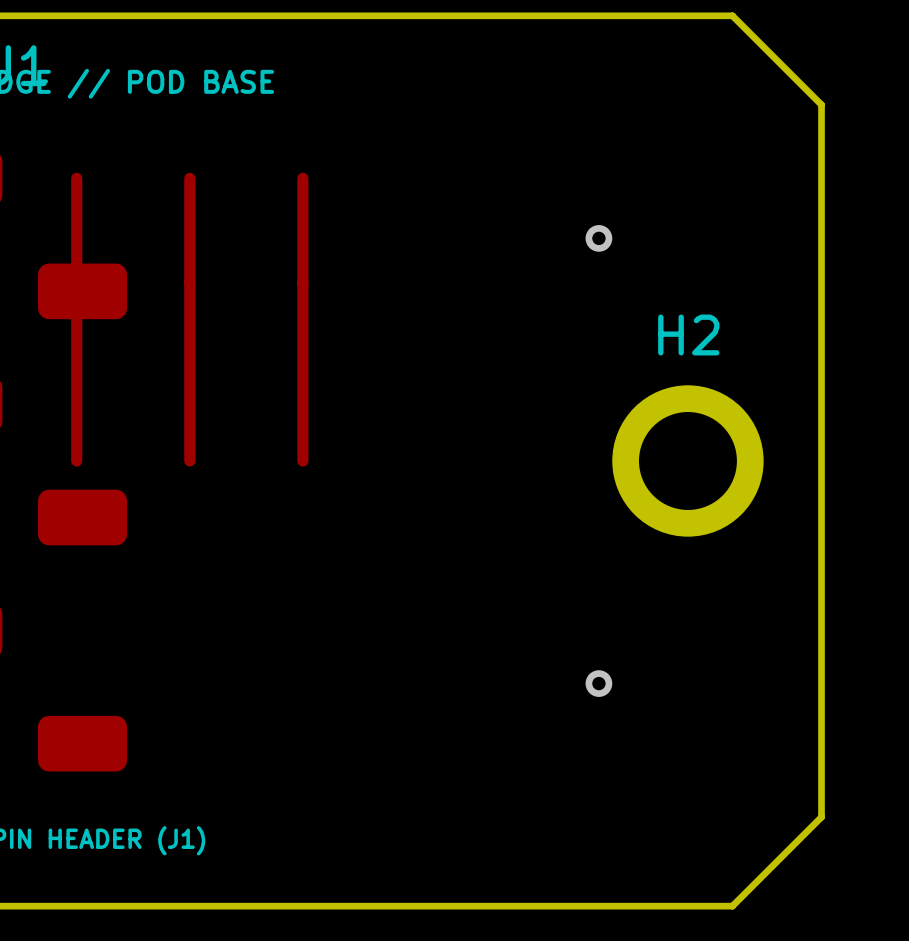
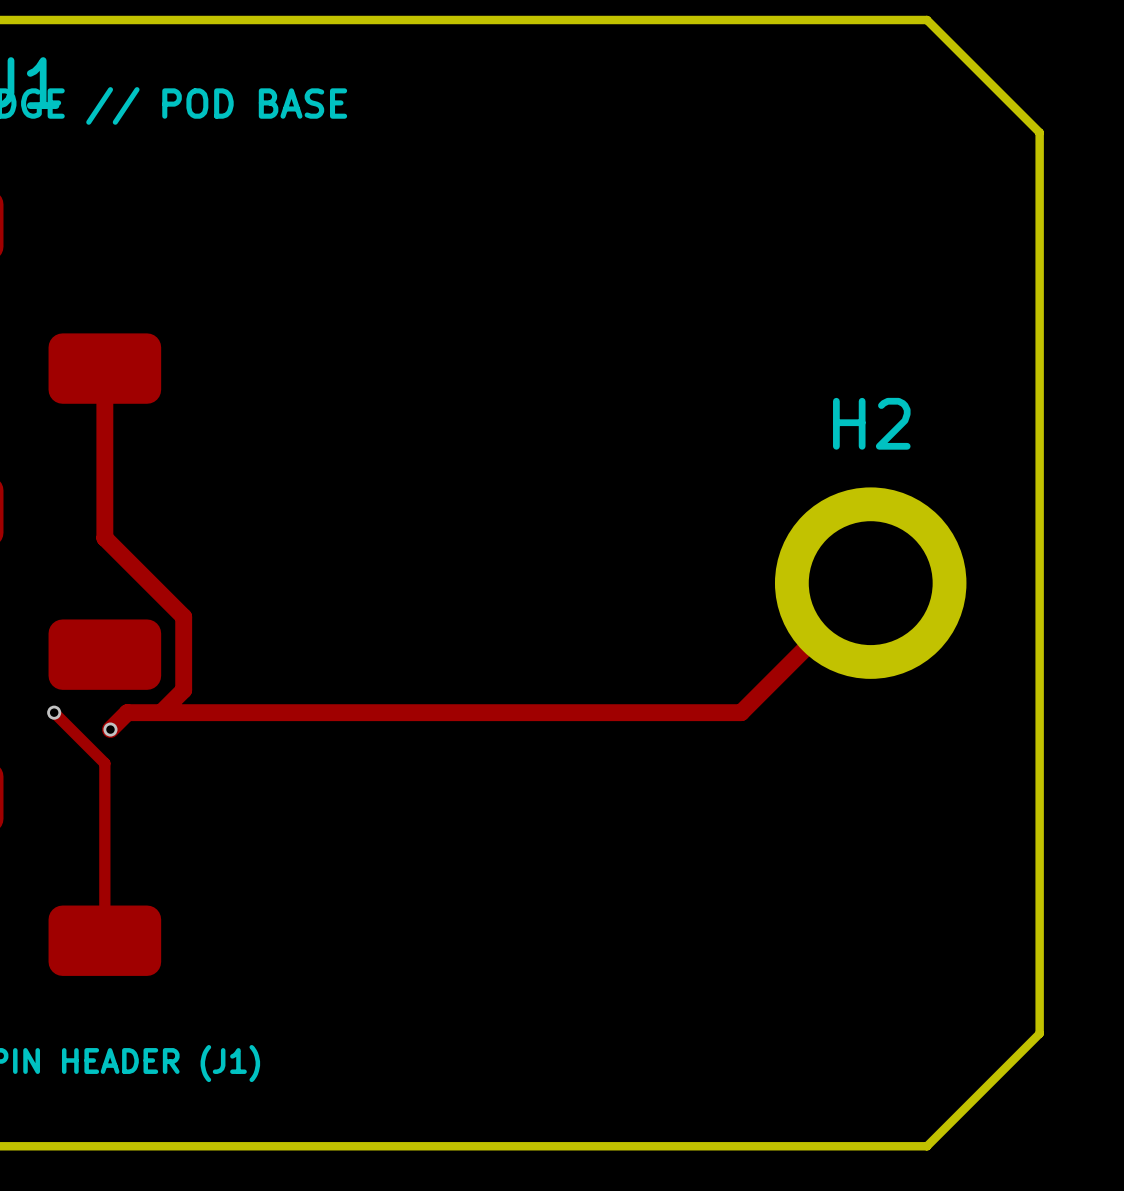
track: (76, 178) (76, 460) -> none
track: (189, 178) (189, 460) -> none
track: (302, 178) (302, 460) -> none
via: (598, 238) -> none
track: none -> (104, 369) (104, 538) (183, 616) (183, 690) (161, 712)
track: none -> (870, 583) (741, 712) (127, 712) (110, 729)
track: none -> (54, 712) (104, 763) (104, 943)
via: none -> (54, 712)
via: none -> (110, 729)
via: (598, 683) -> none

